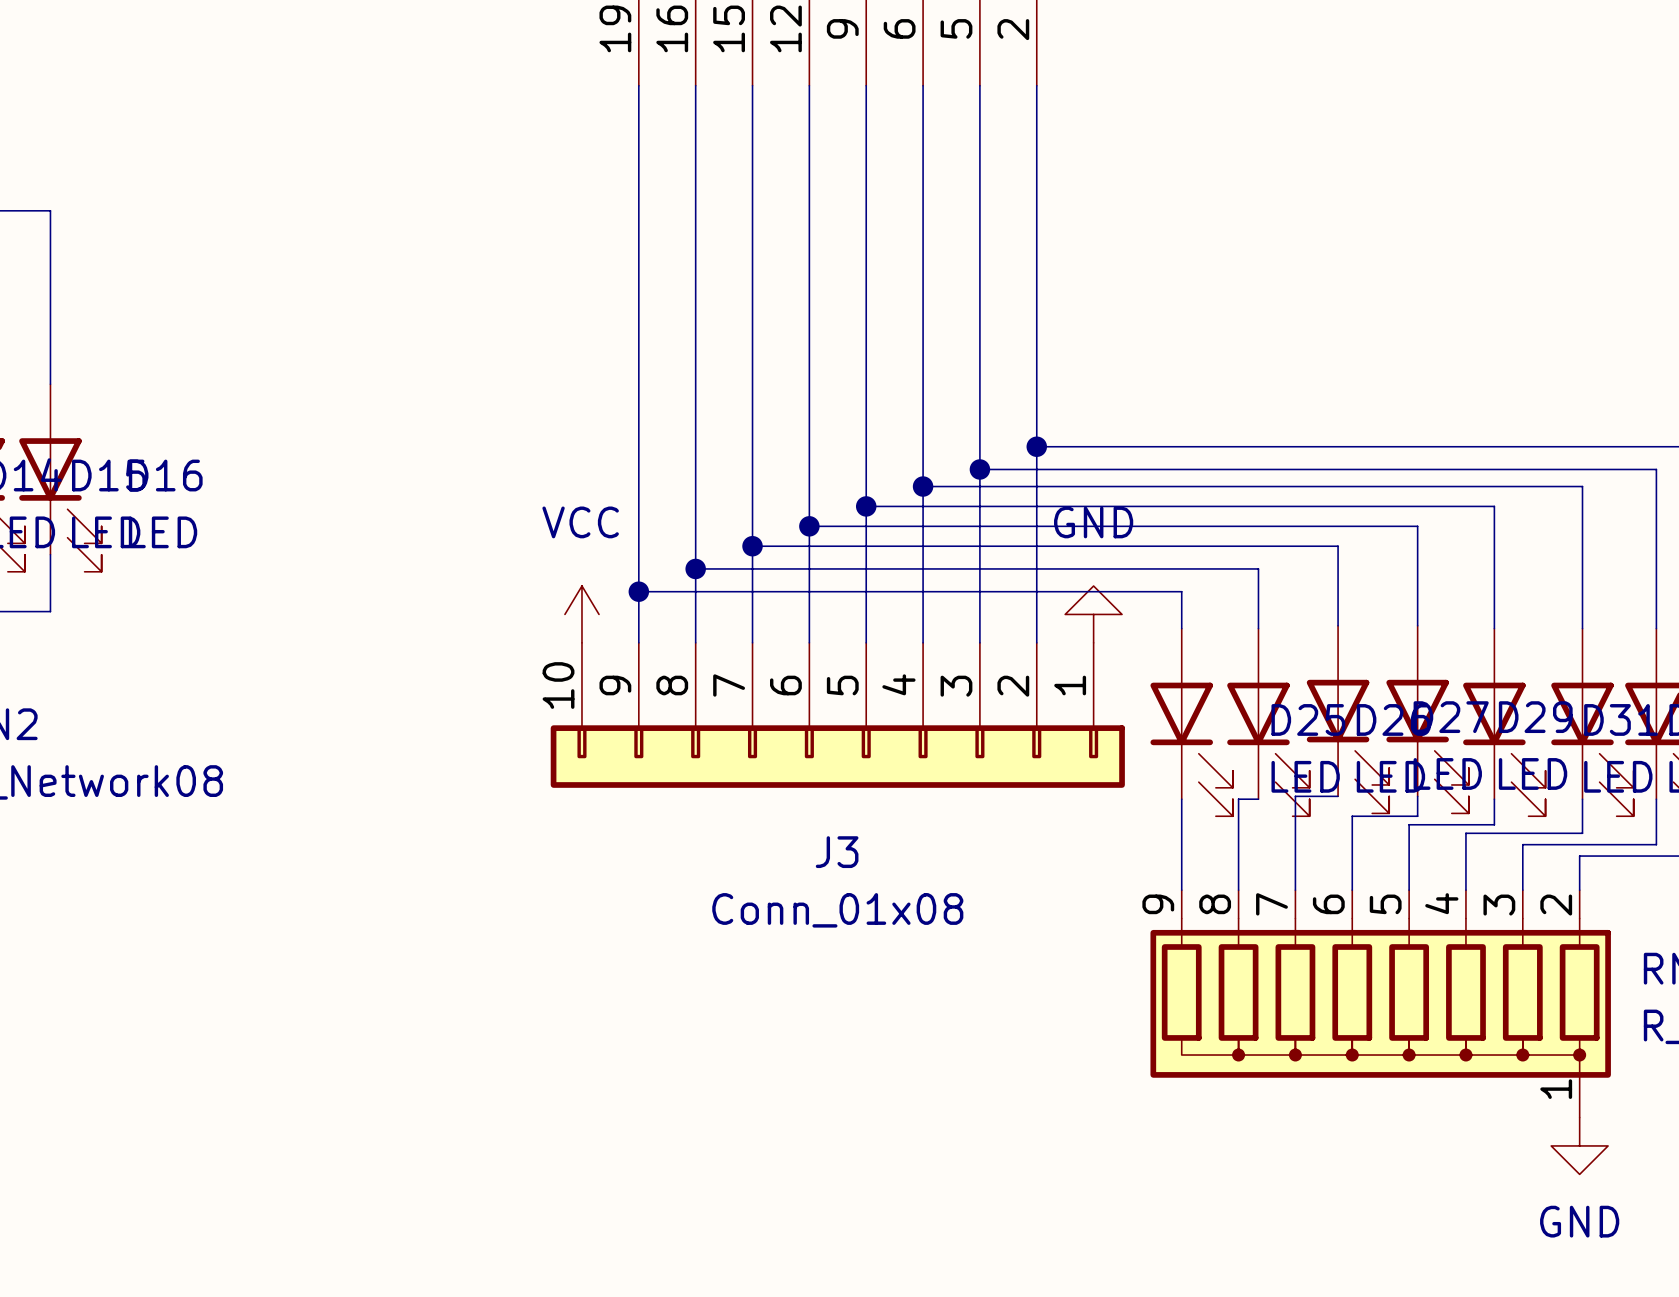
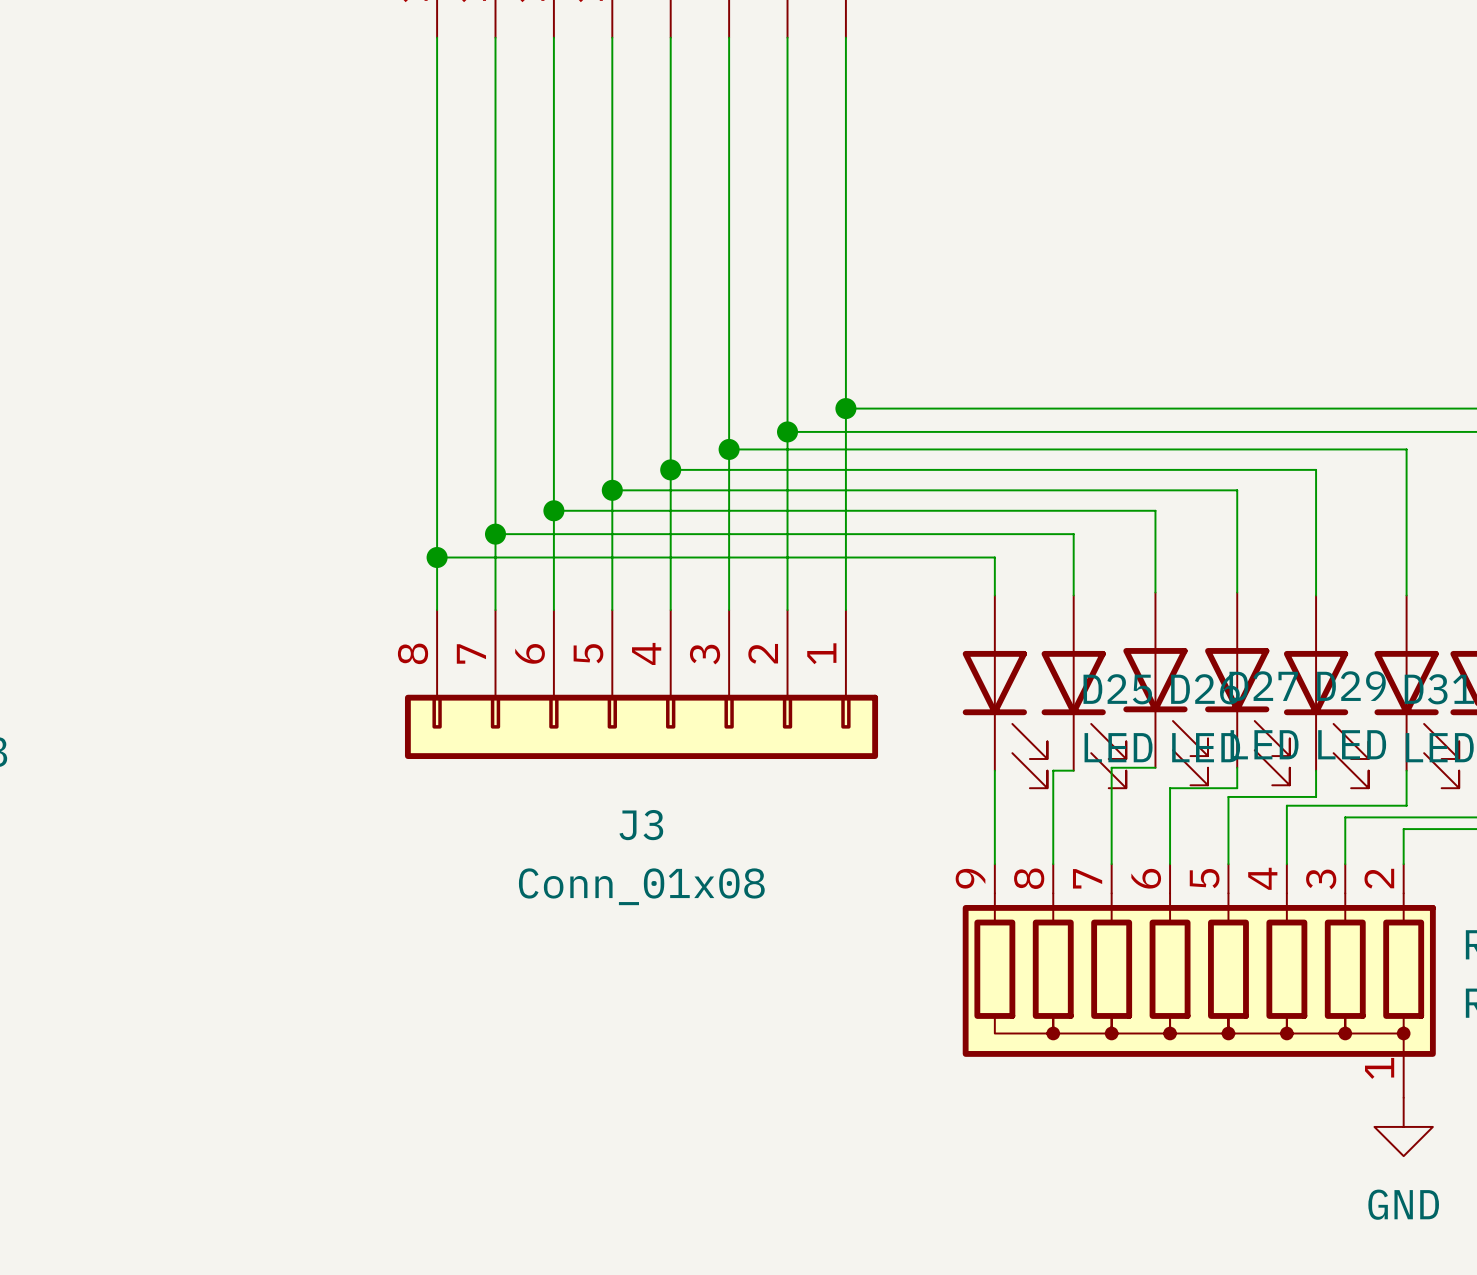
power symbol: VCC (581, 614) -> none
power symbol: GND (1093, 614) -> none
J3 symbol: [550, 642, 1125, 788] -> [404, 610, 879, 759]

